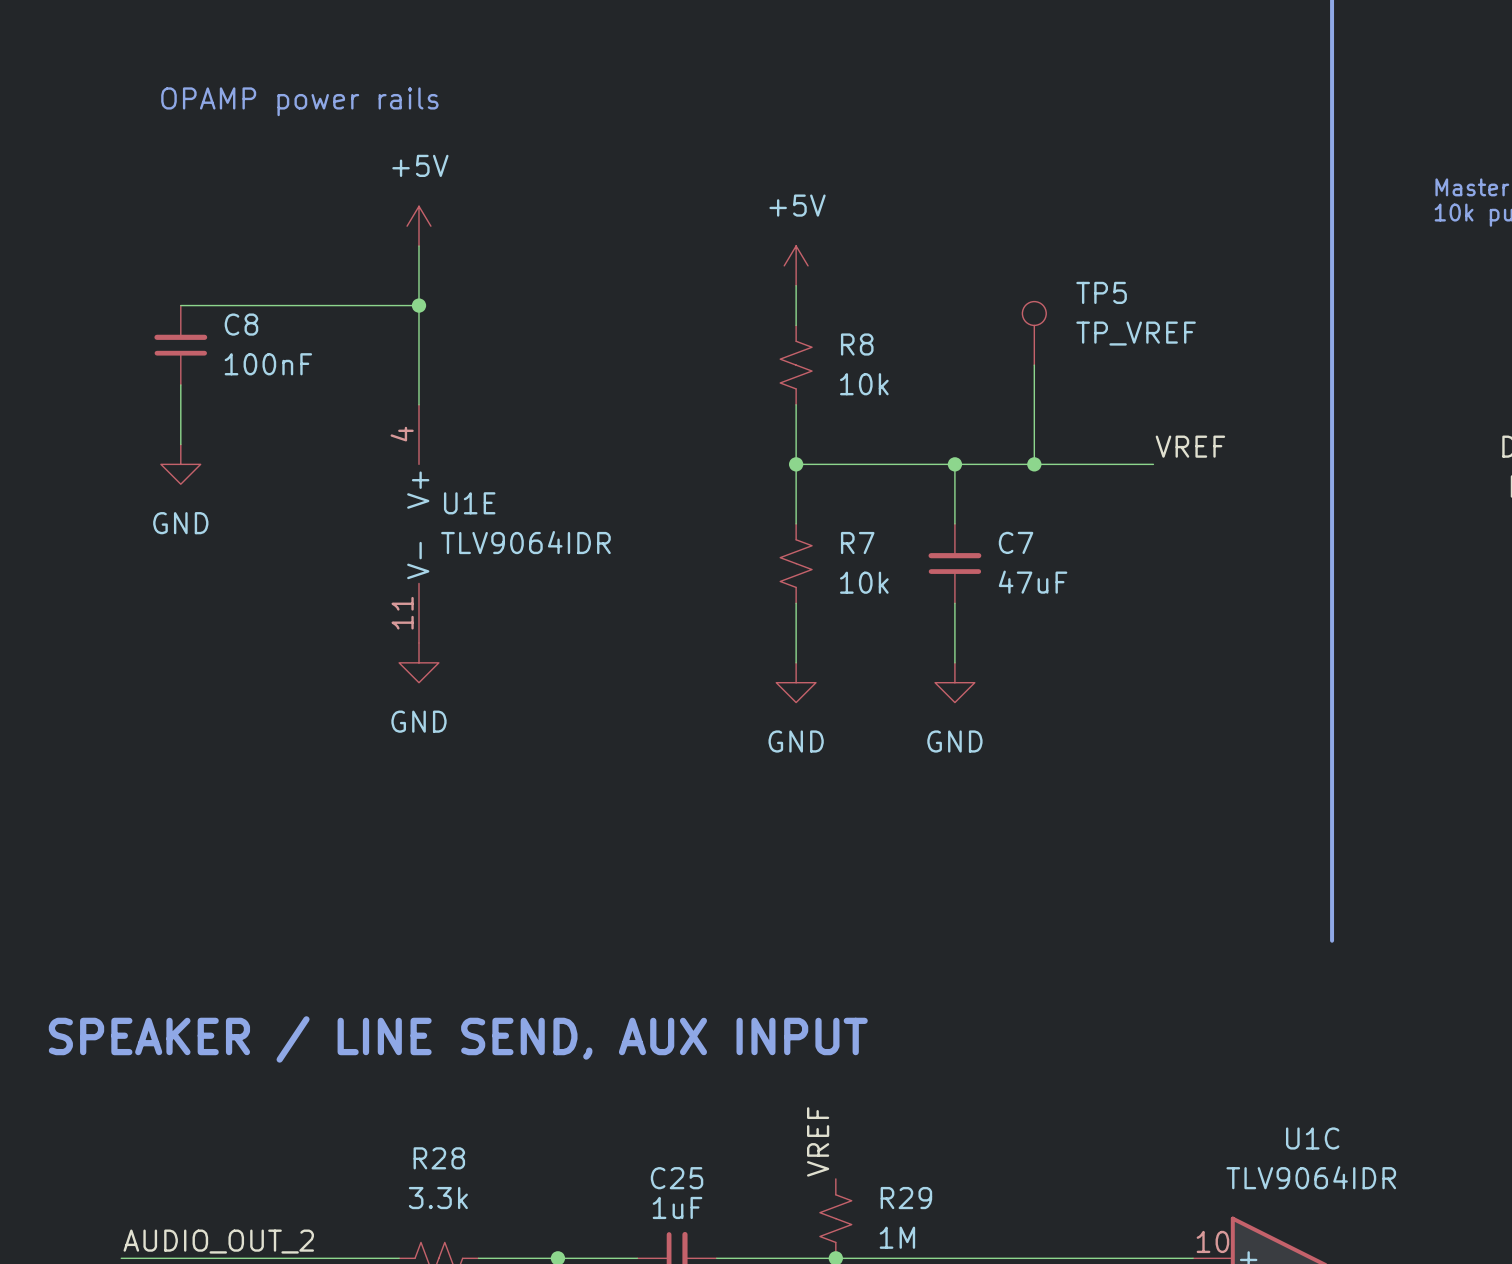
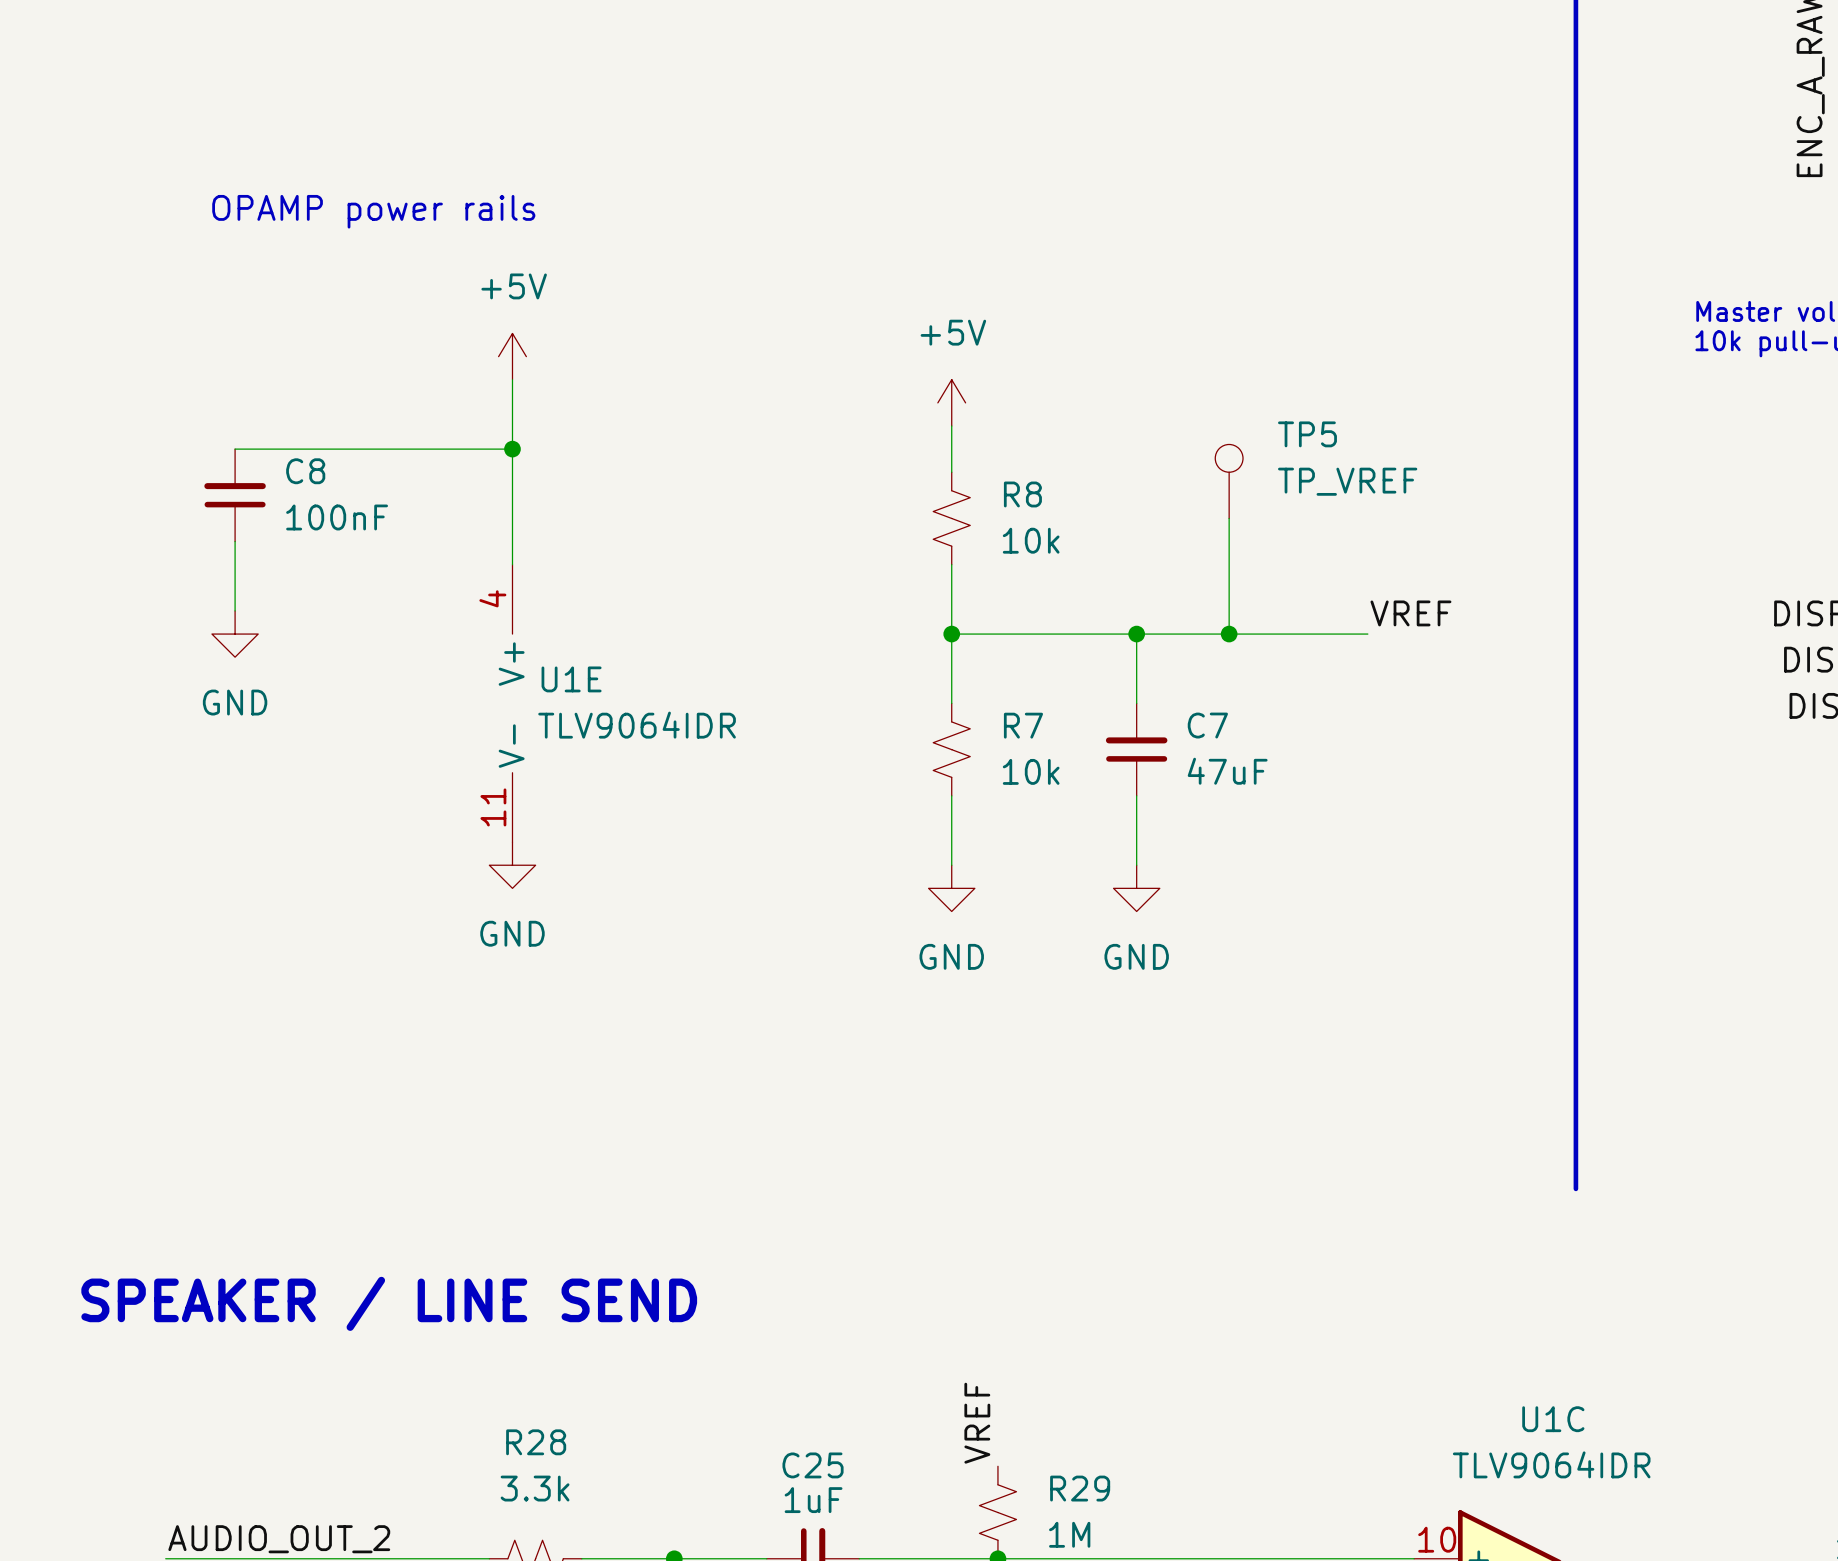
text: SPEAKER / LINE SEND, AUX INPUT (458, 1039) -> SPEAKER / LINE SEND (389, 1303)

